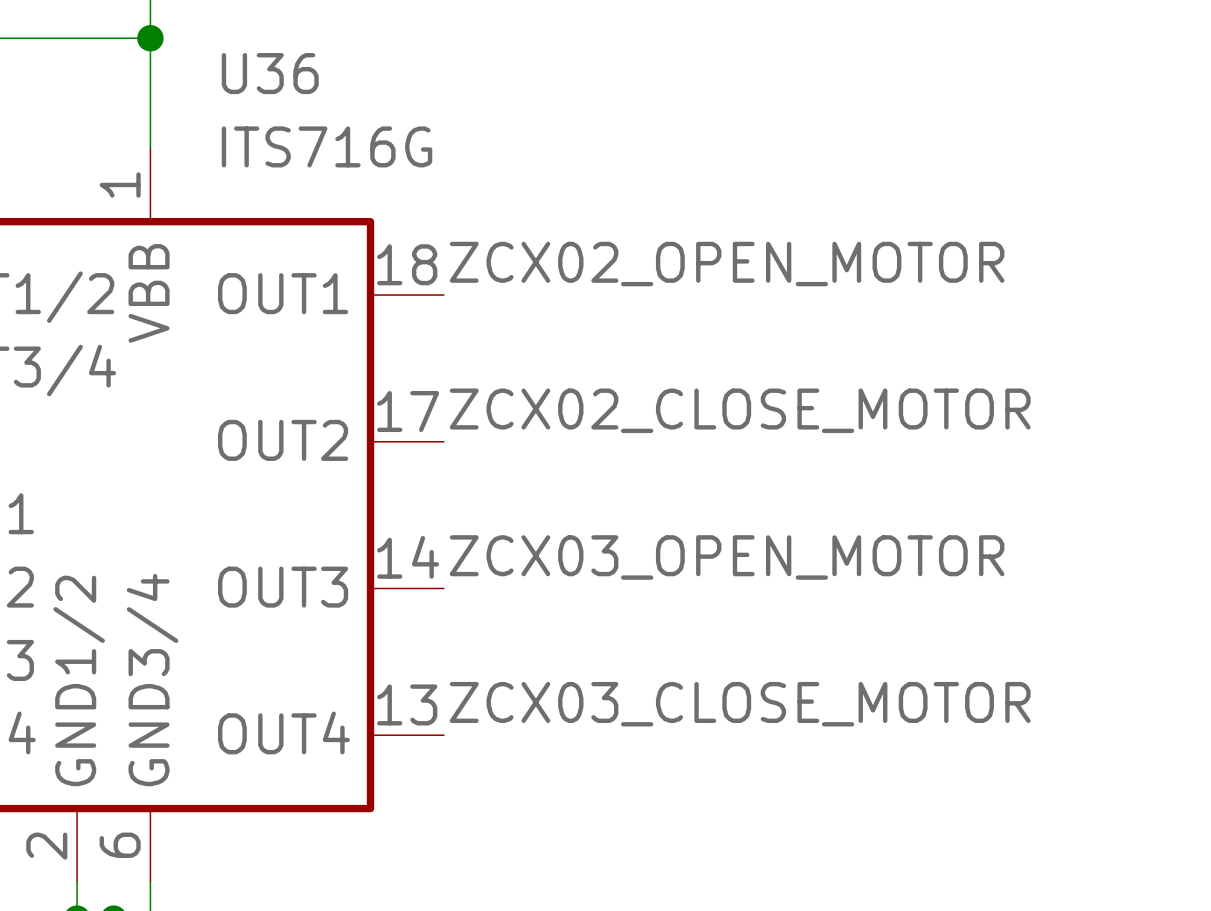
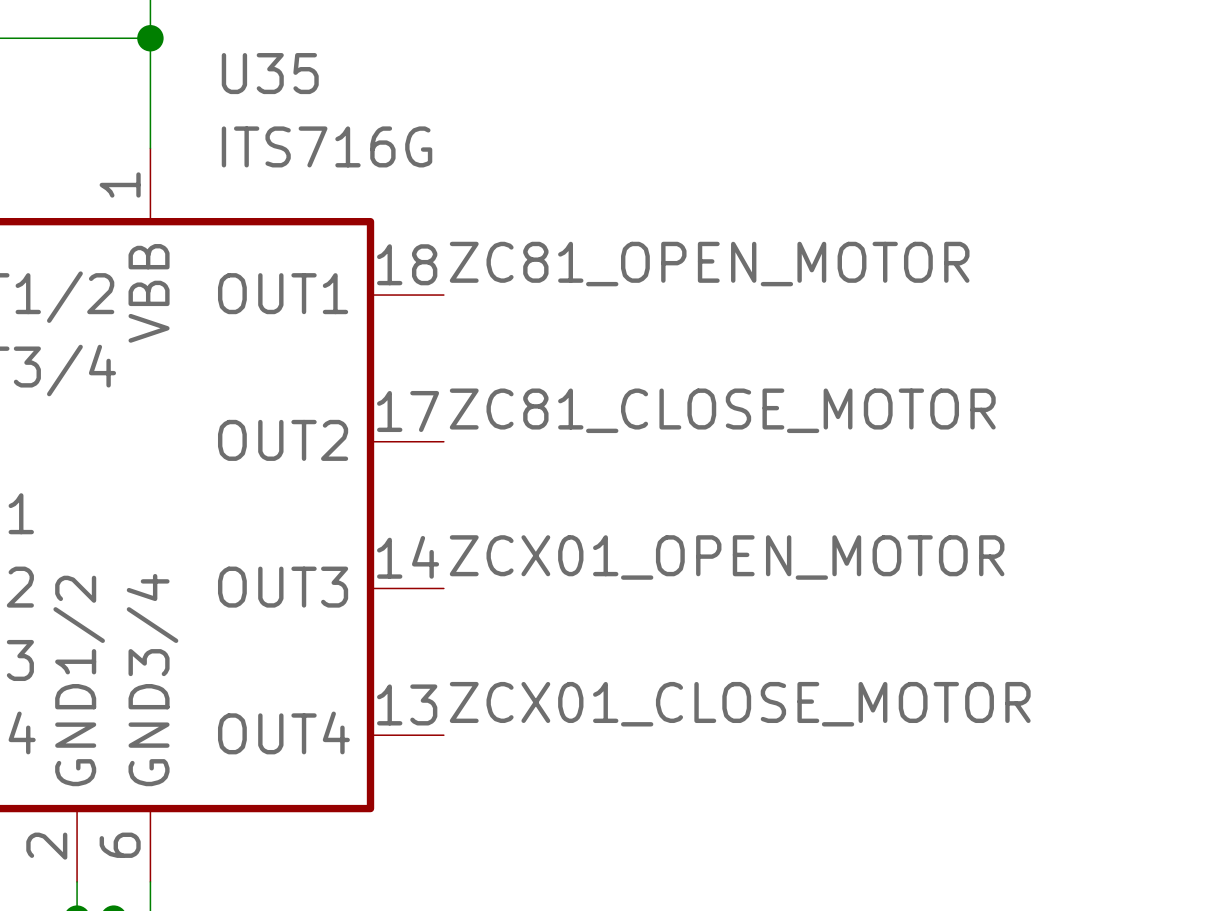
U36 name: U36 (270, 73) -> U35 (270, 73)
label: ZCX02_OPEN_MOTOR (727, 264) -> ZC81_OPEN_MOTOR (709, 264)
label: ZCX02_CLOSE_MOTOR (740, 410) -> ZC81_CLOSE_MOTOR (722, 410)
label: ZCX03_OPEN_MOTOR (727, 557) -> ZCX01_OPEN_MOTOR (727, 557)
label: ZCX03_CLOSE_MOTOR (740, 704) -> ZCX01_CLOSE_MOTOR (740, 704)

